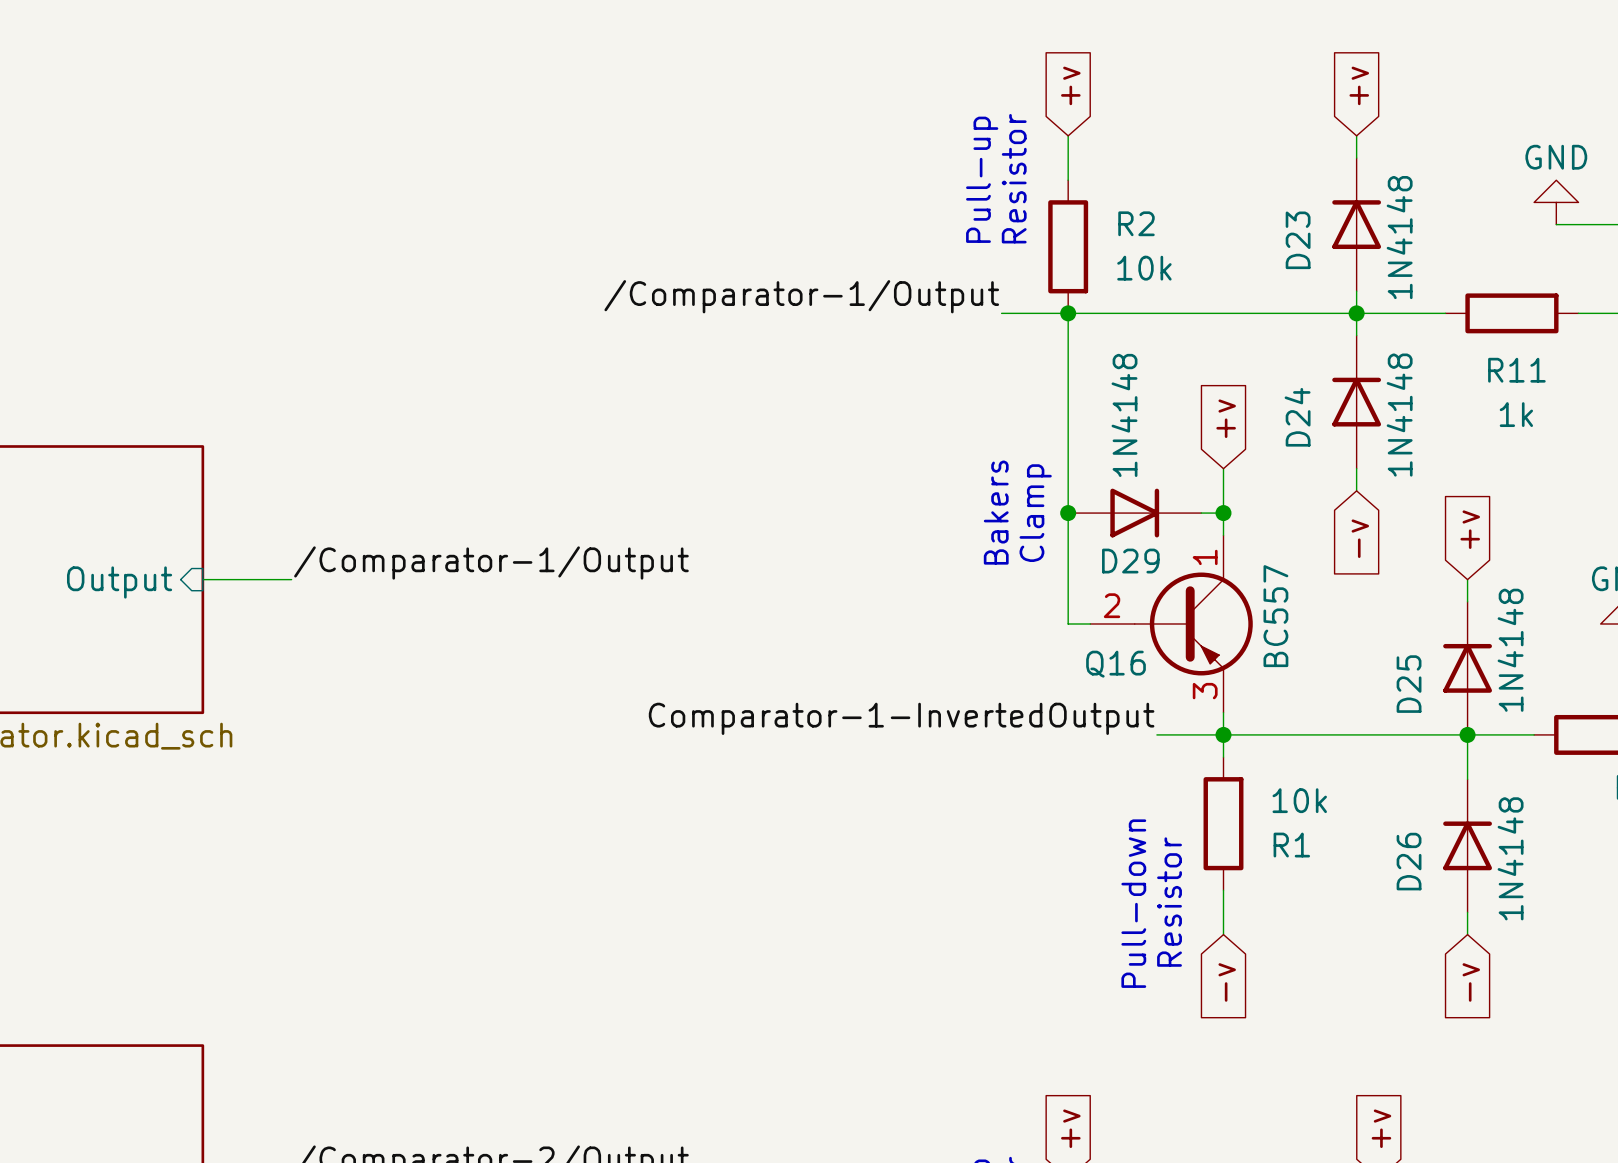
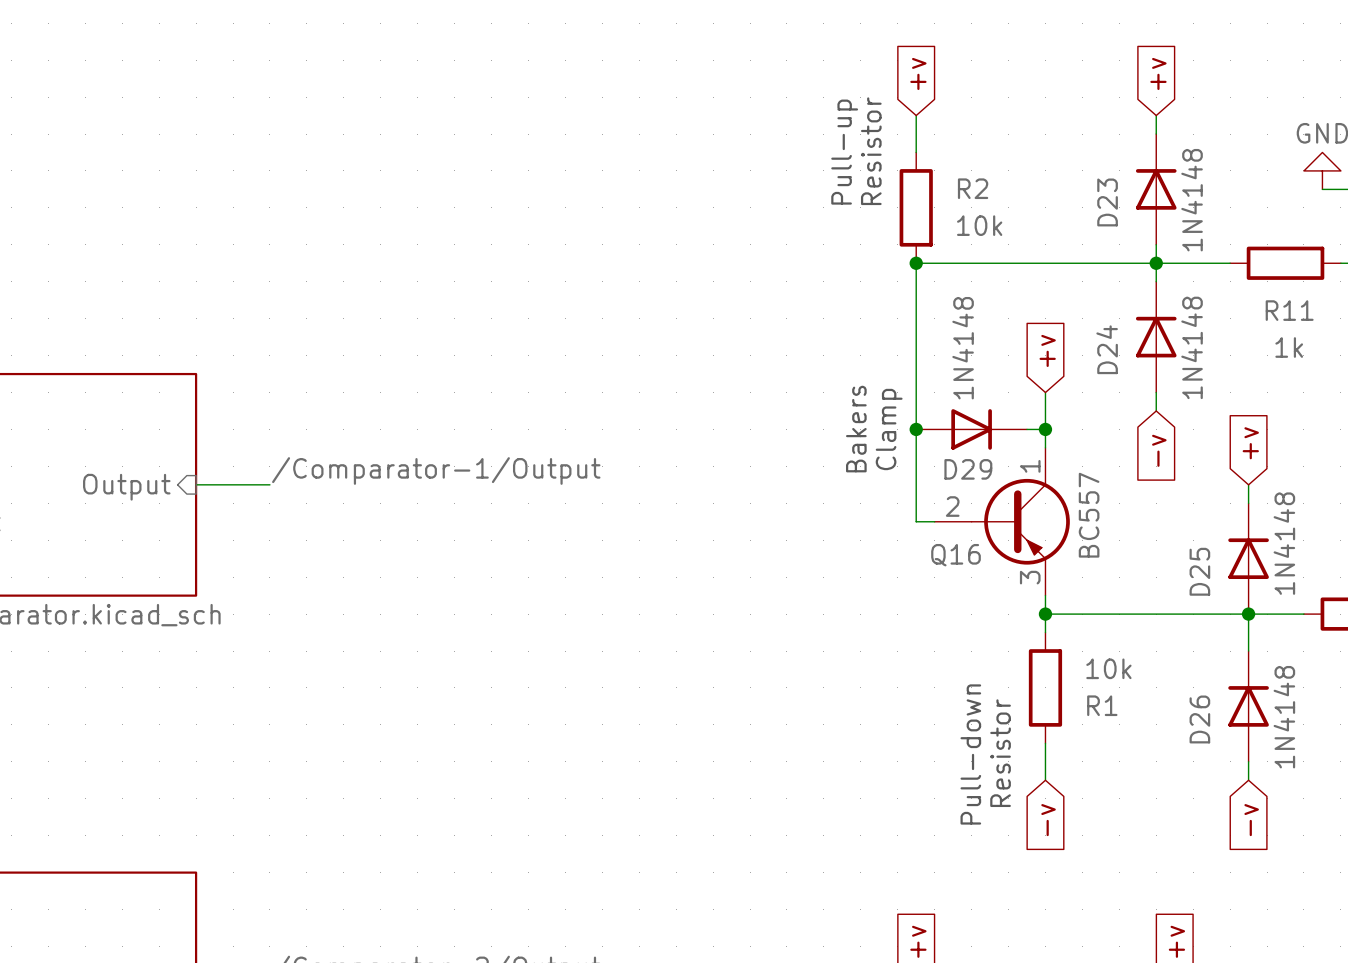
label: /Comparator-1/Output (801, 296) -> none
wire: (1001, 313) (1068, 313) -> none
label: Comparator-1-InvertedOutput (901, 718) -> none
wire: (1156, 734) (1223, 734) -> none

